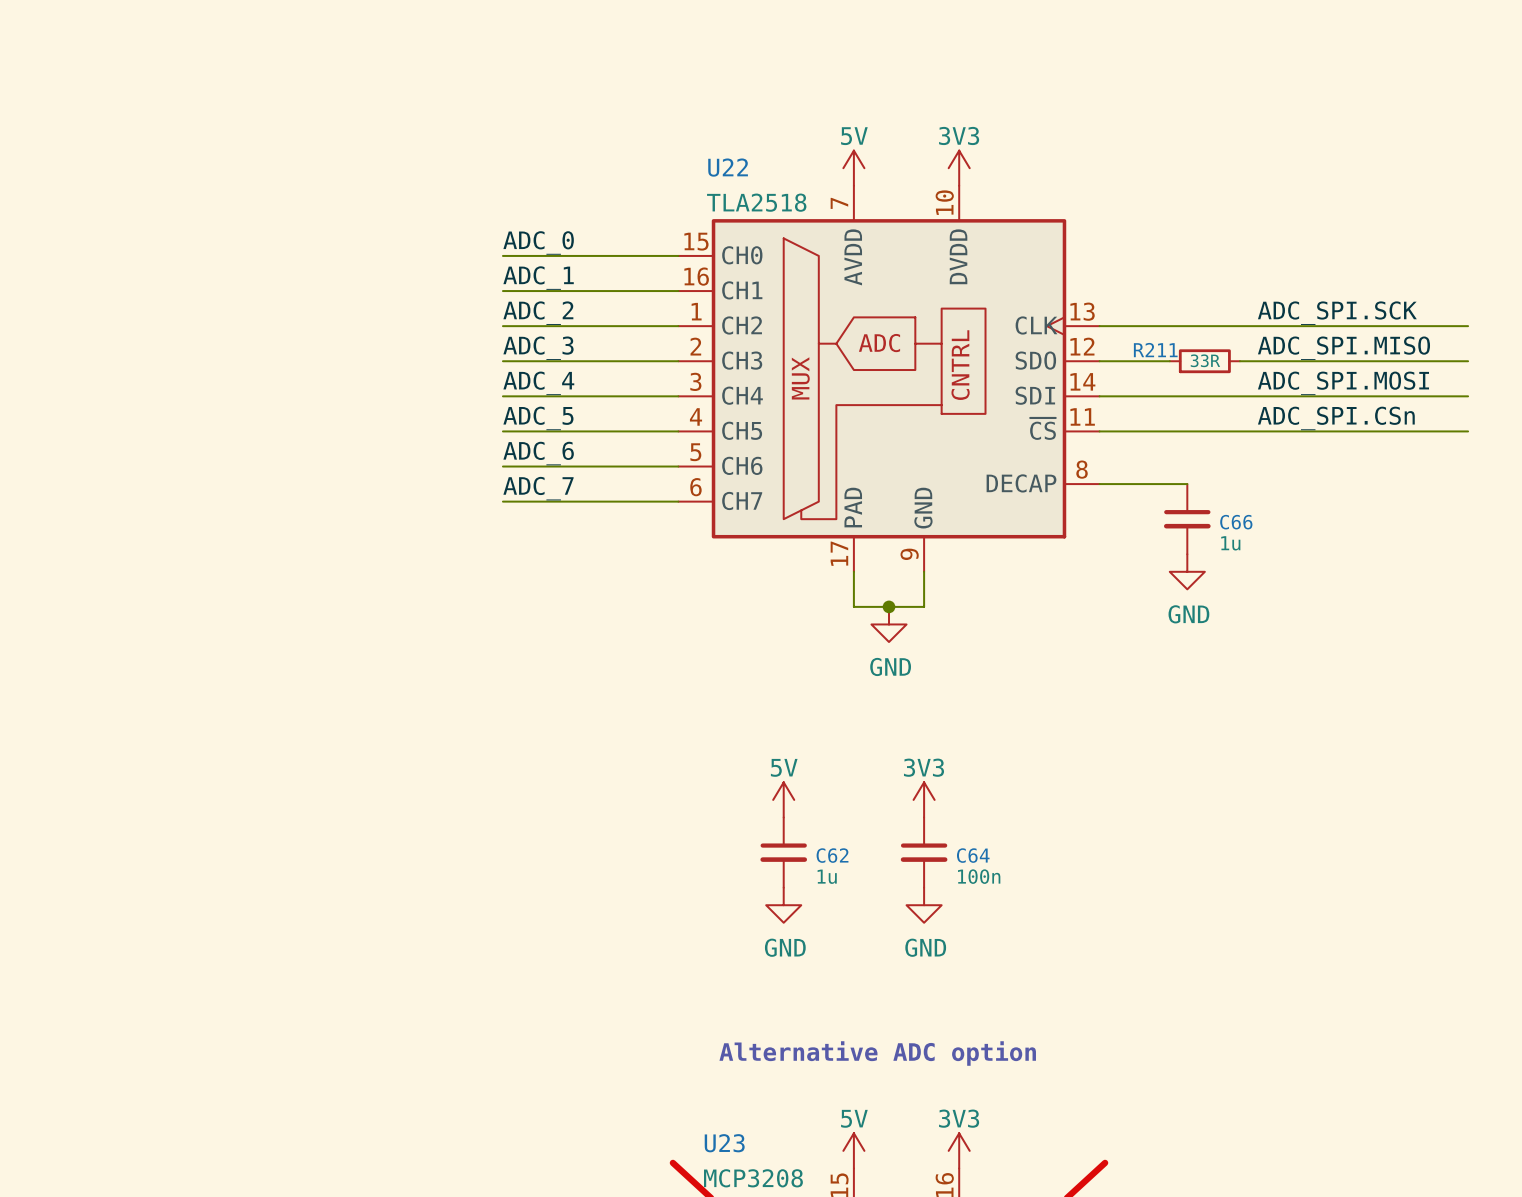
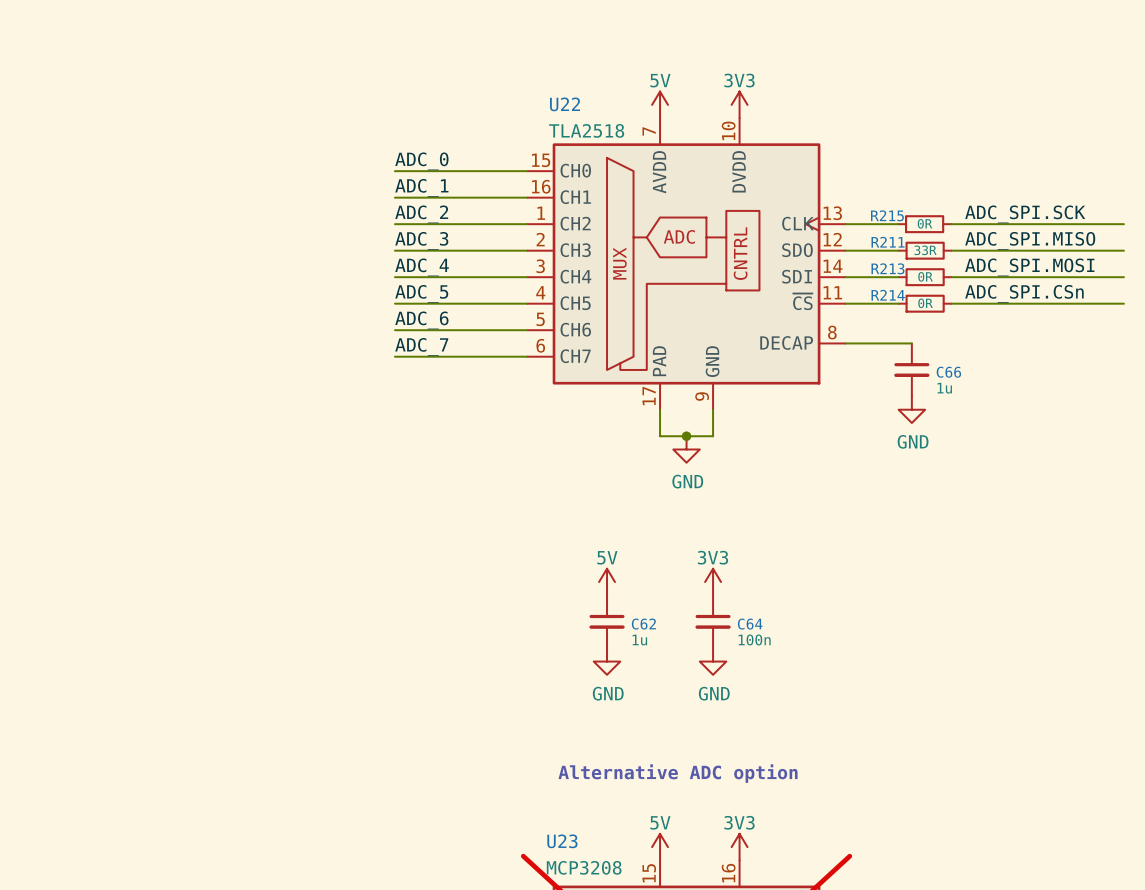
wire: (1169, 326) (1239, 326) -> none
R215: none -> 0R (924, 224)
wire: (1169, 396) (1239, 396) -> none
R213: none -> 0R (925, 277)
wire: (1169, 431) (1239, 431) -> none
R214: none -> 0R (925, 303)

